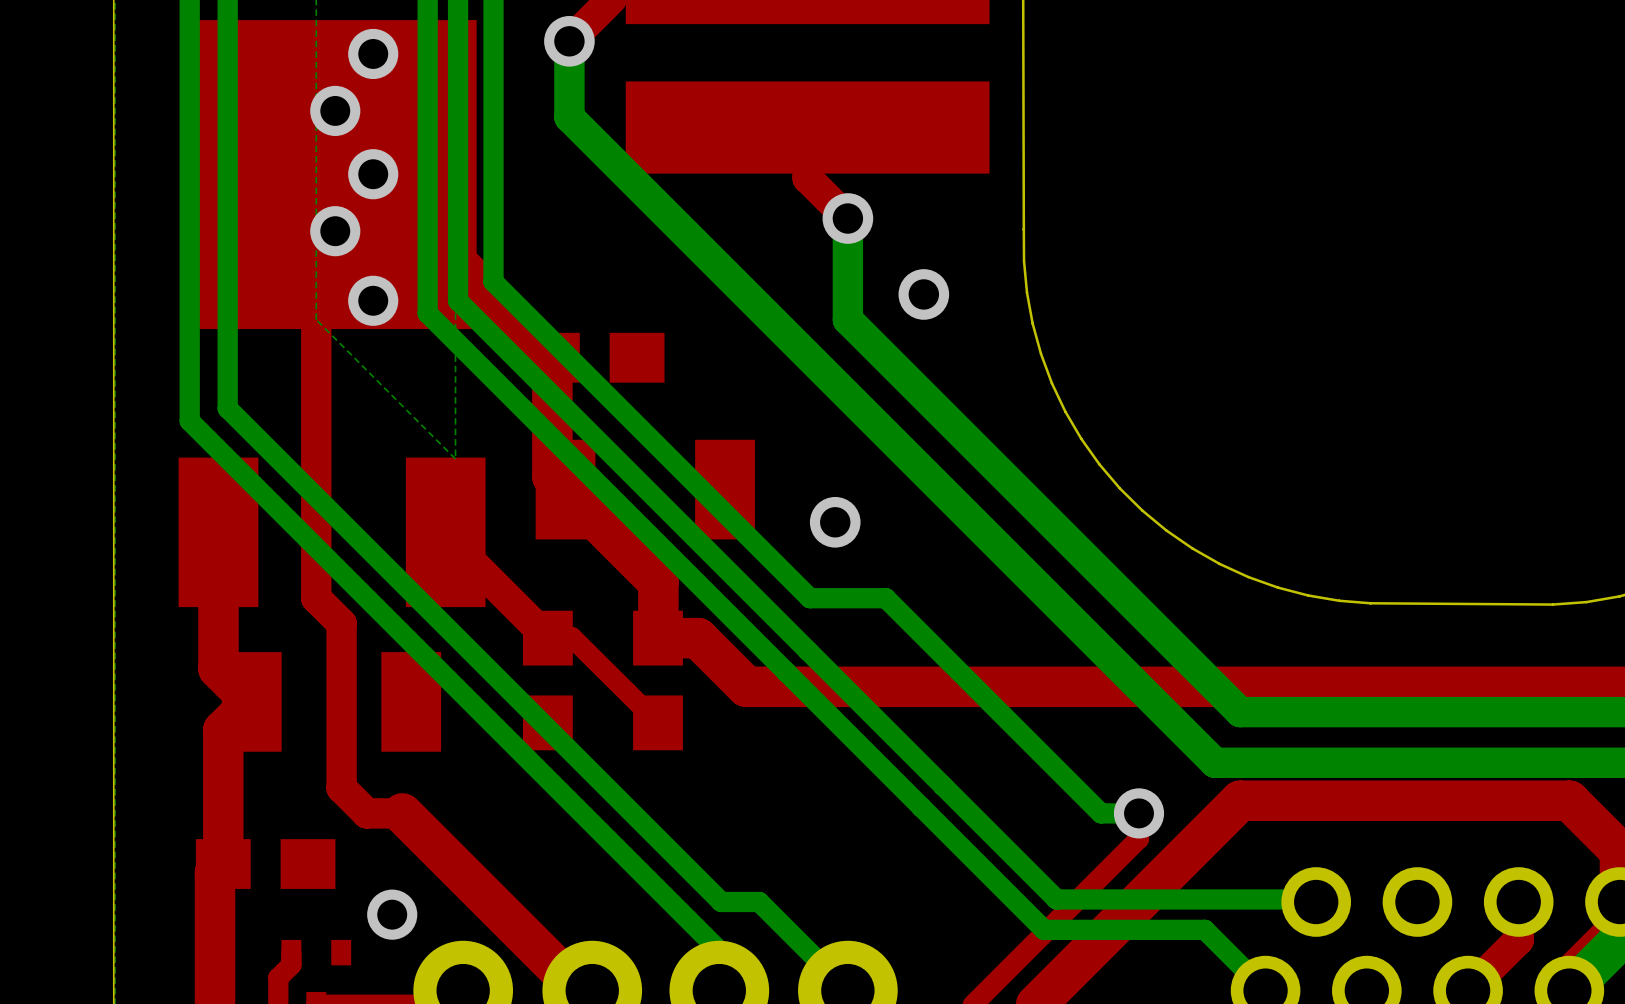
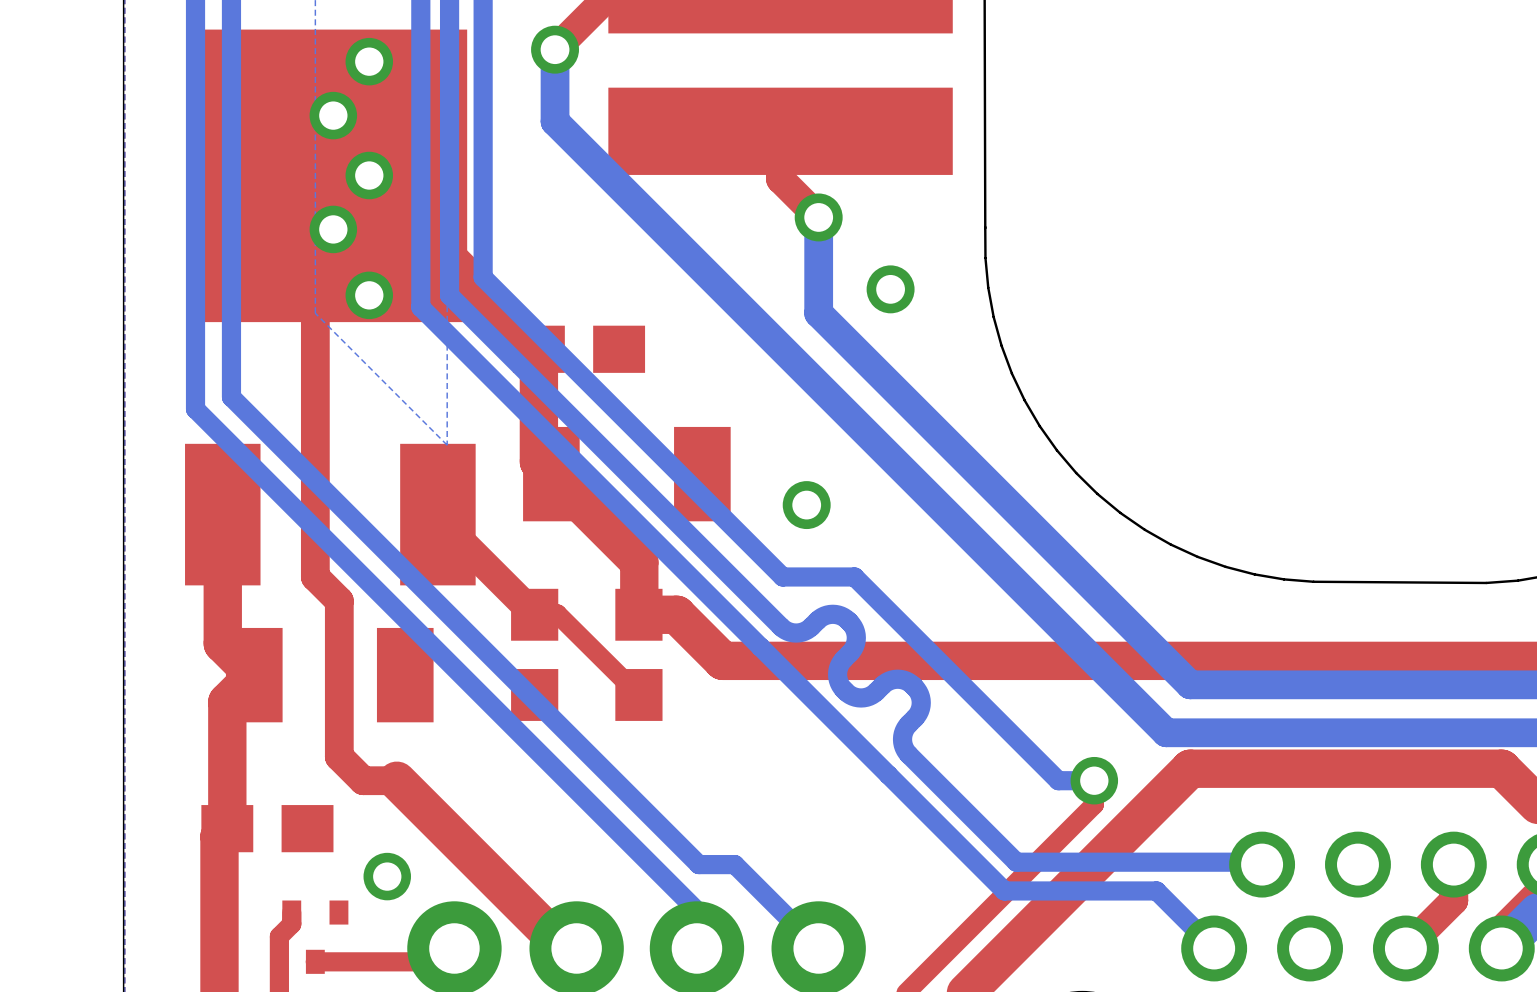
bottom track: (808, 650) (874, 717) -> (780, 626) (790, 632) (801, 632) (809, 628) (822, 617) (832, 614) (841, 615) (850, 622) (855, 632) (856, 640) (853, 648) (842, 661) (838, 668) (838, 680) (843, 689)
bottom track: (876, 719) (943, 785) -> (845, 691) (855, 697) (866, 697) (874, 693) (886, 682) (894, 679) (905, 680) (912, 685) (919, 694) (921, 702) (918, 713) (906, 726) (903, 733) (903, 744) (908, 754)

